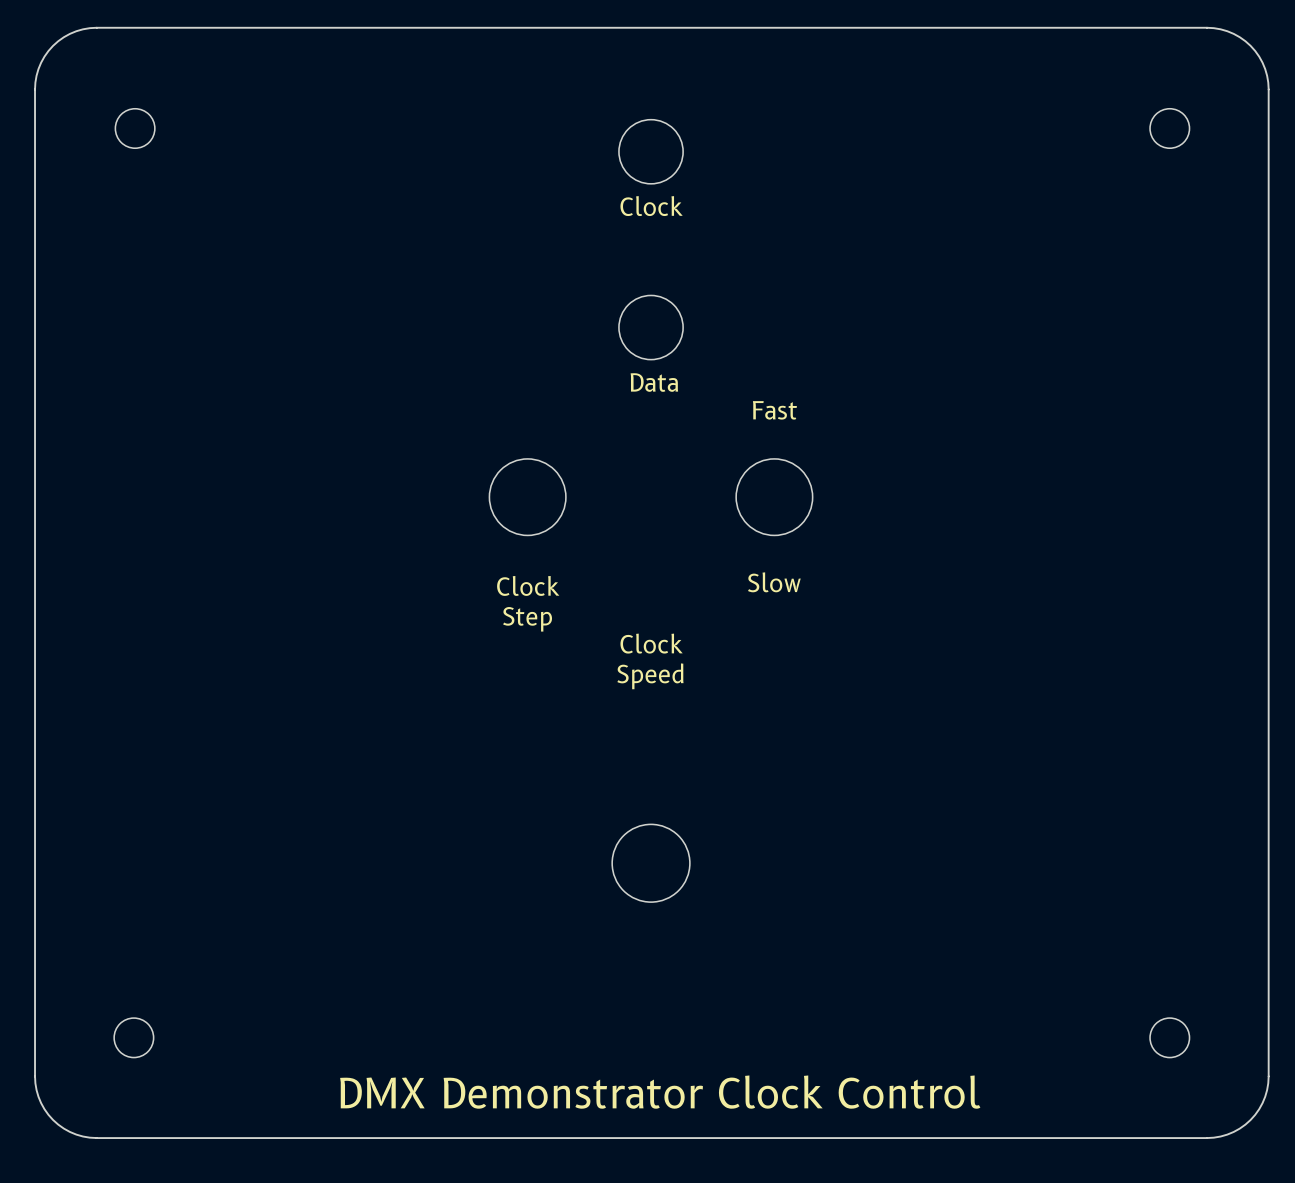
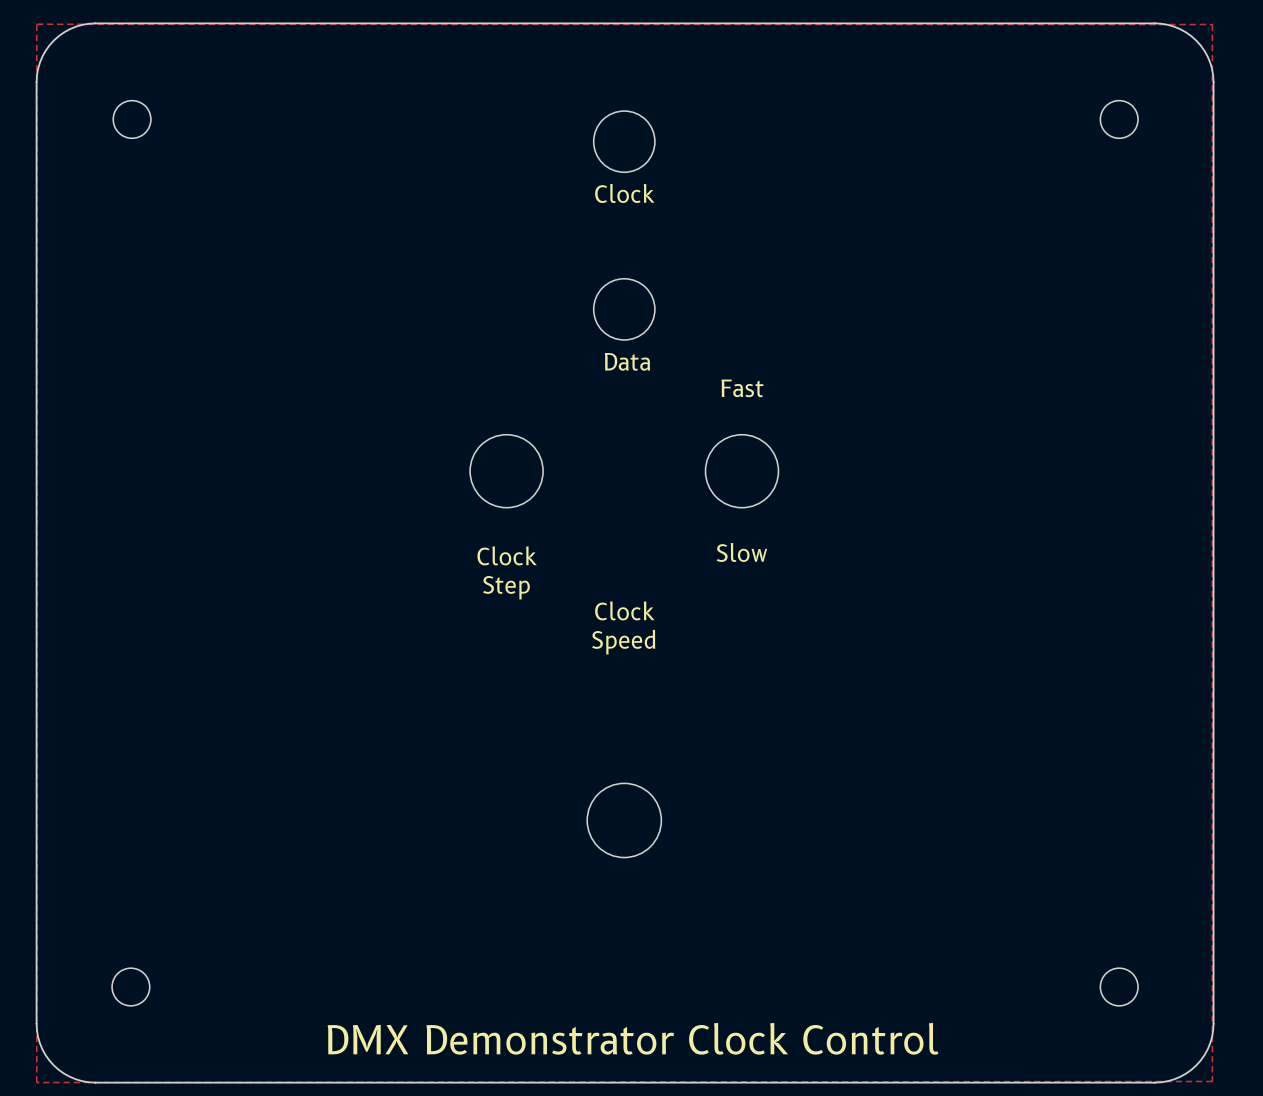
zone outline: none -> (36, 24) (1212, 24) (1212, 1081) (36, 1082) (36, 24)

